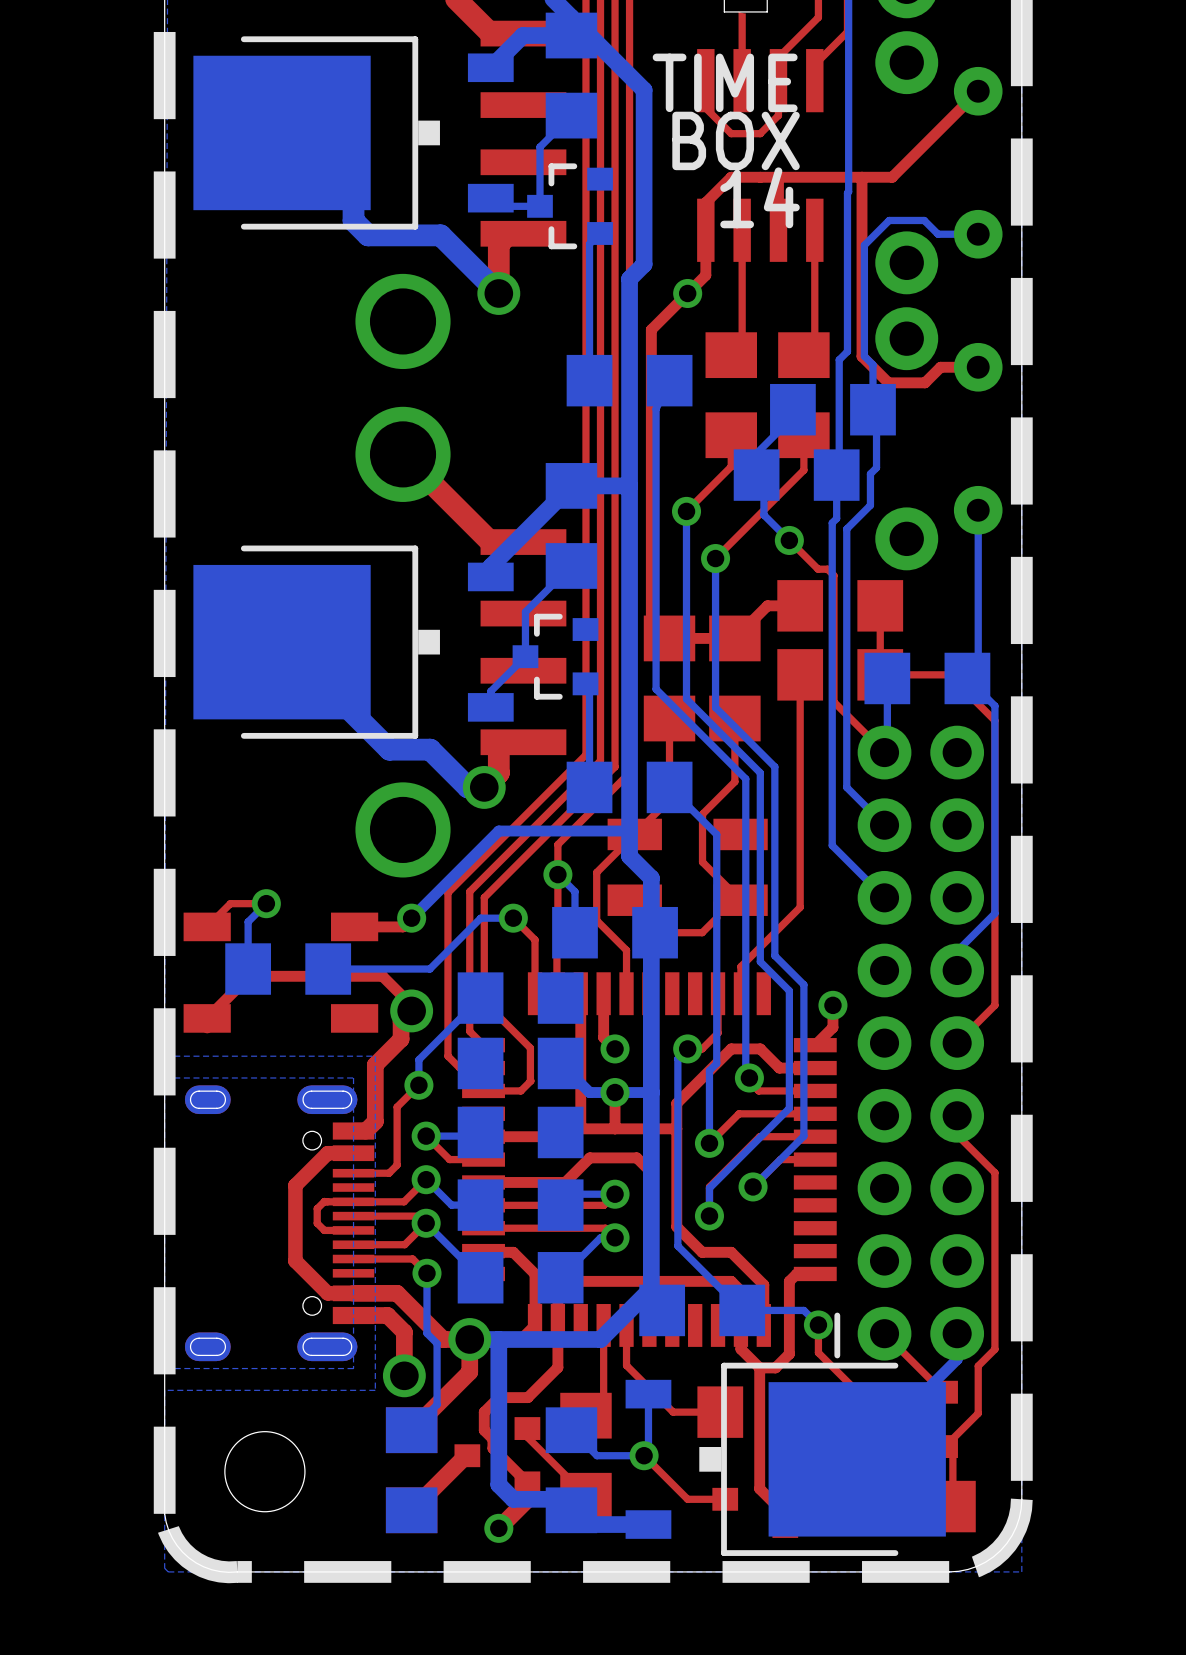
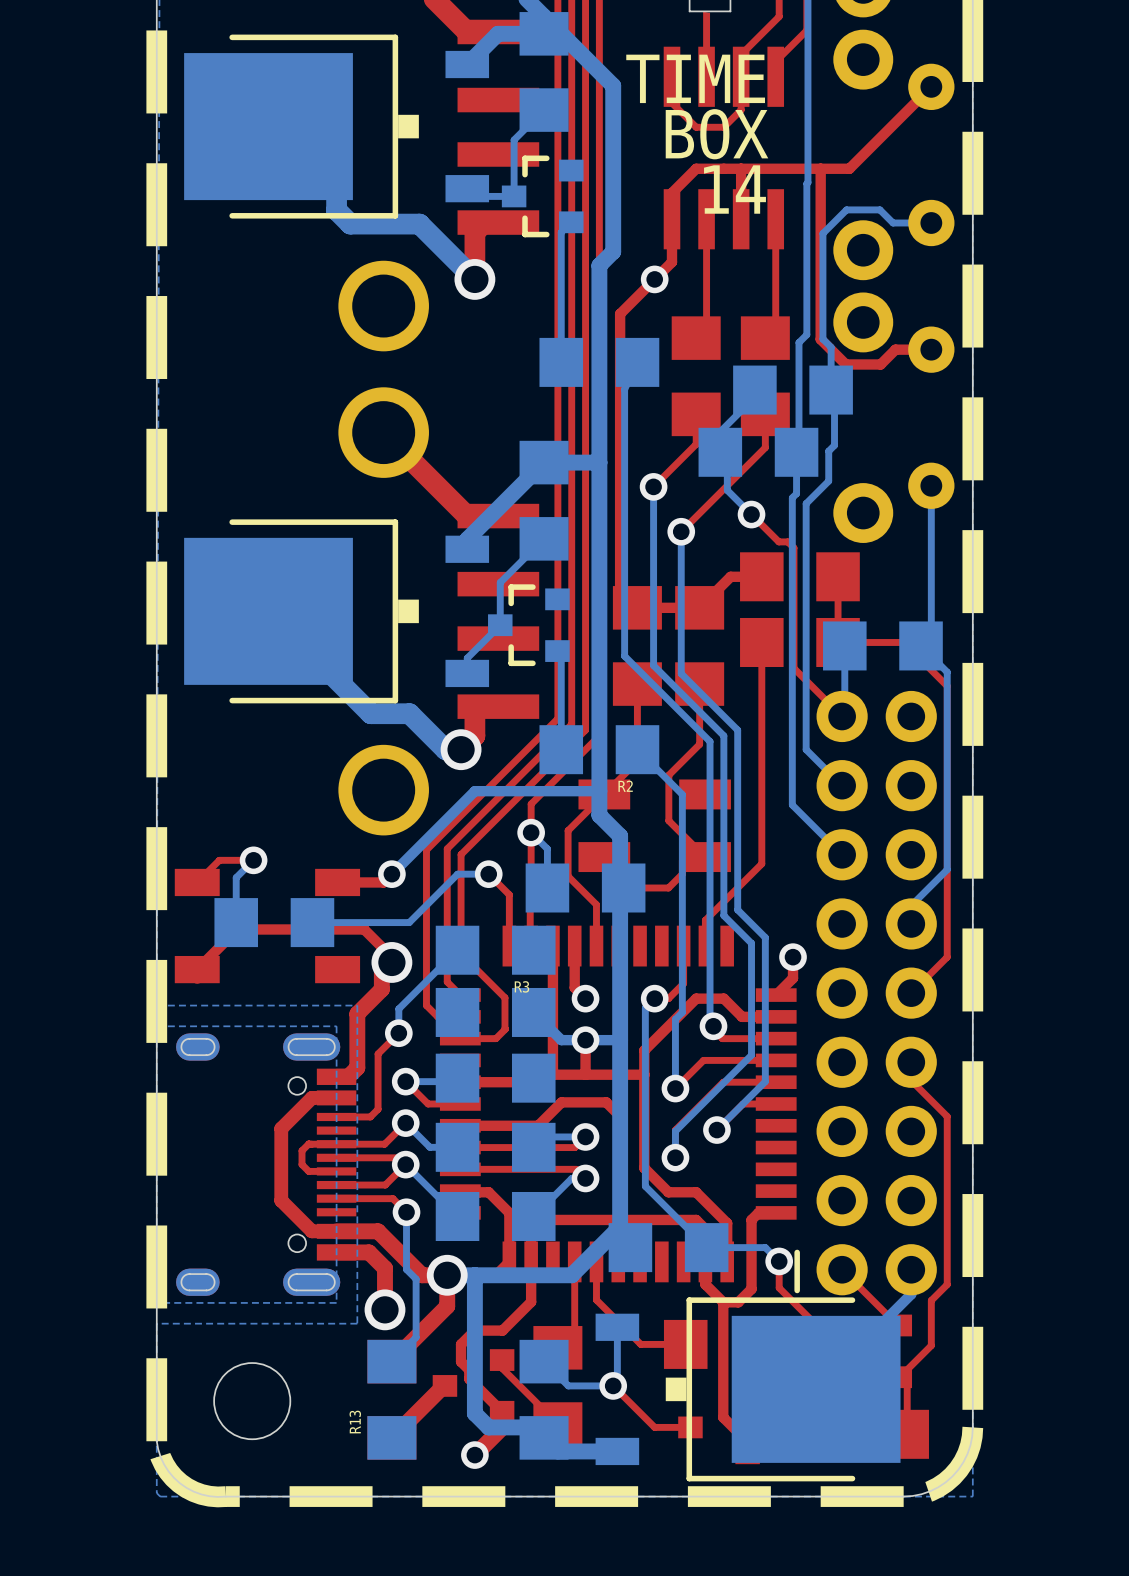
R2 name: none -> R2 (625, 786)
R3 name: none -> R3 (521, 986)
R13 name: none -> R13 (355, 1422)

